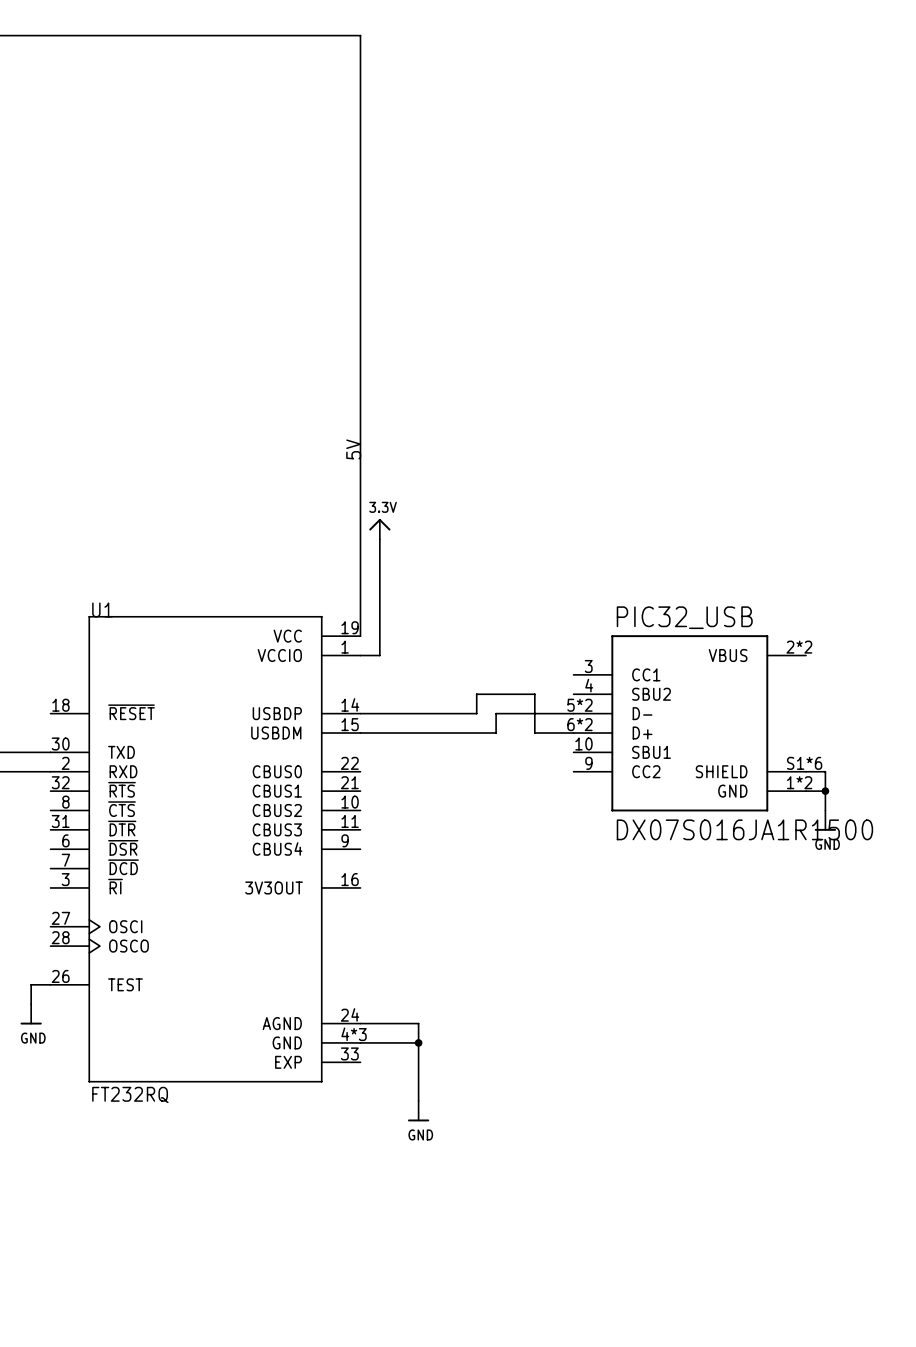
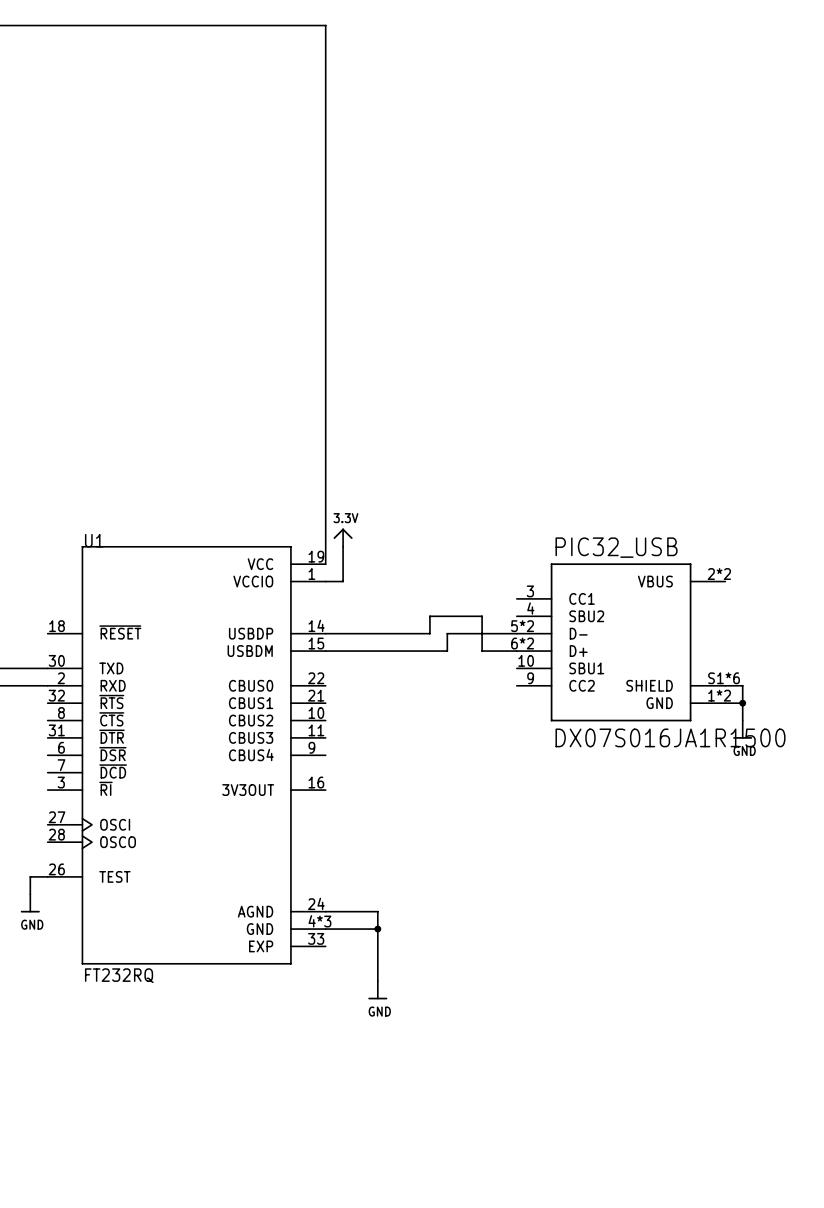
label: 5V (353, 449) -> none
power symbol position: 3.3V (379, 529) -> 3.3V (343, 537)
wire: (379, 539) (379, 616) -> none

